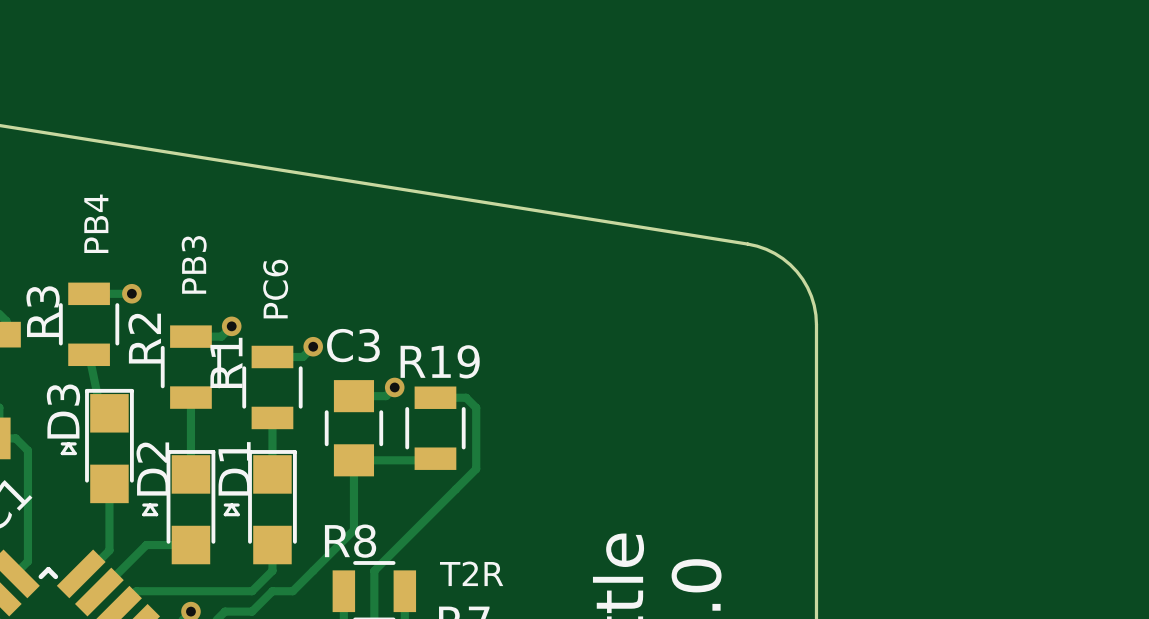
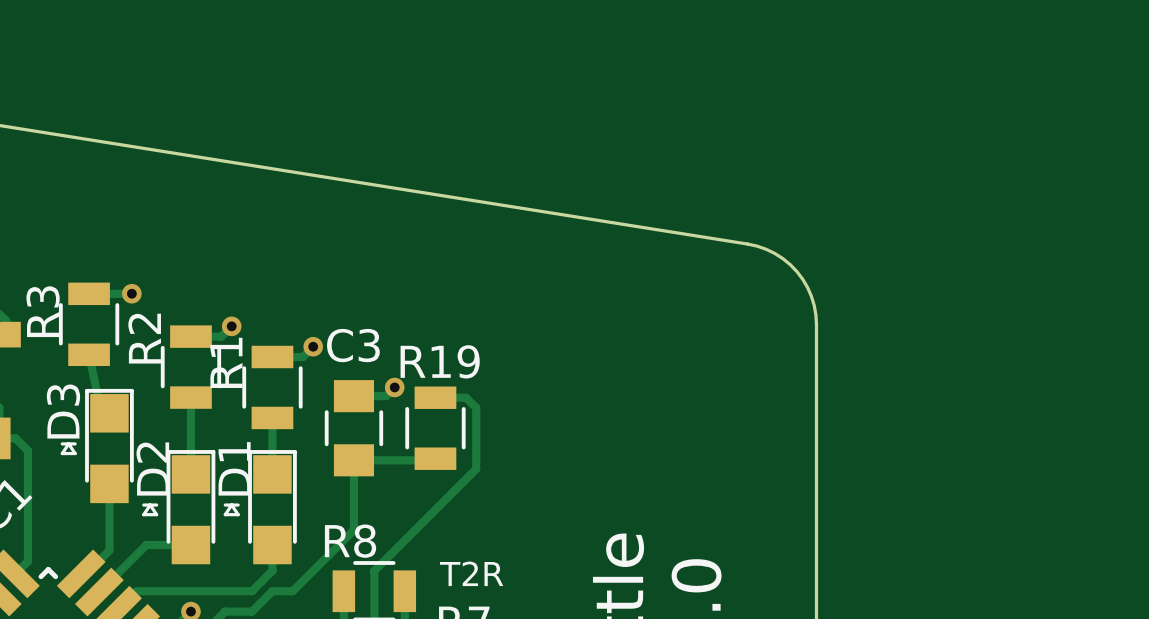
text: PB4 (96, 223) -> none
text: PB3 (194, 264) -> none
text: PC6 (275, 289) -> none

